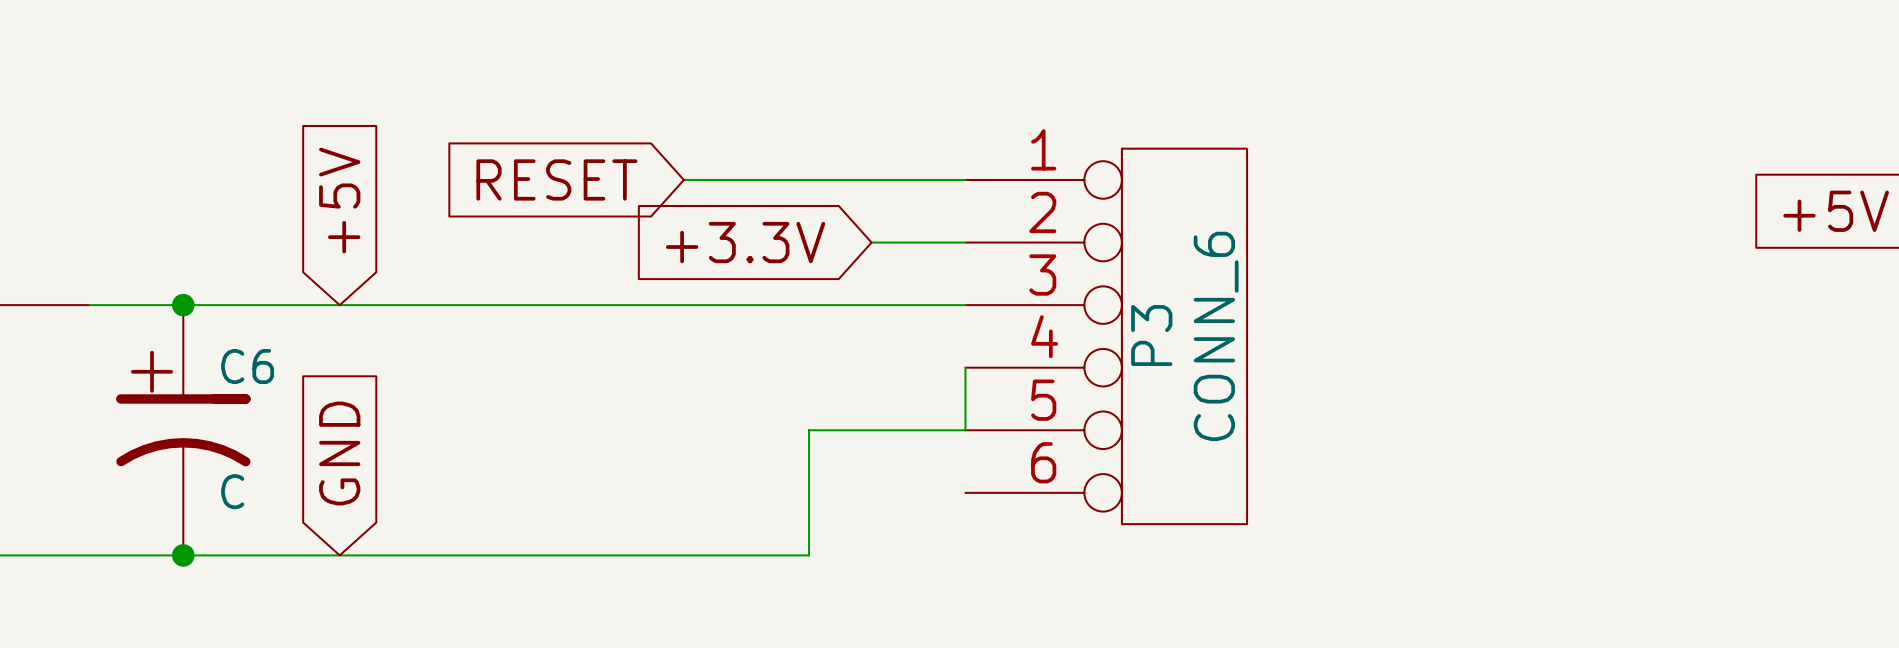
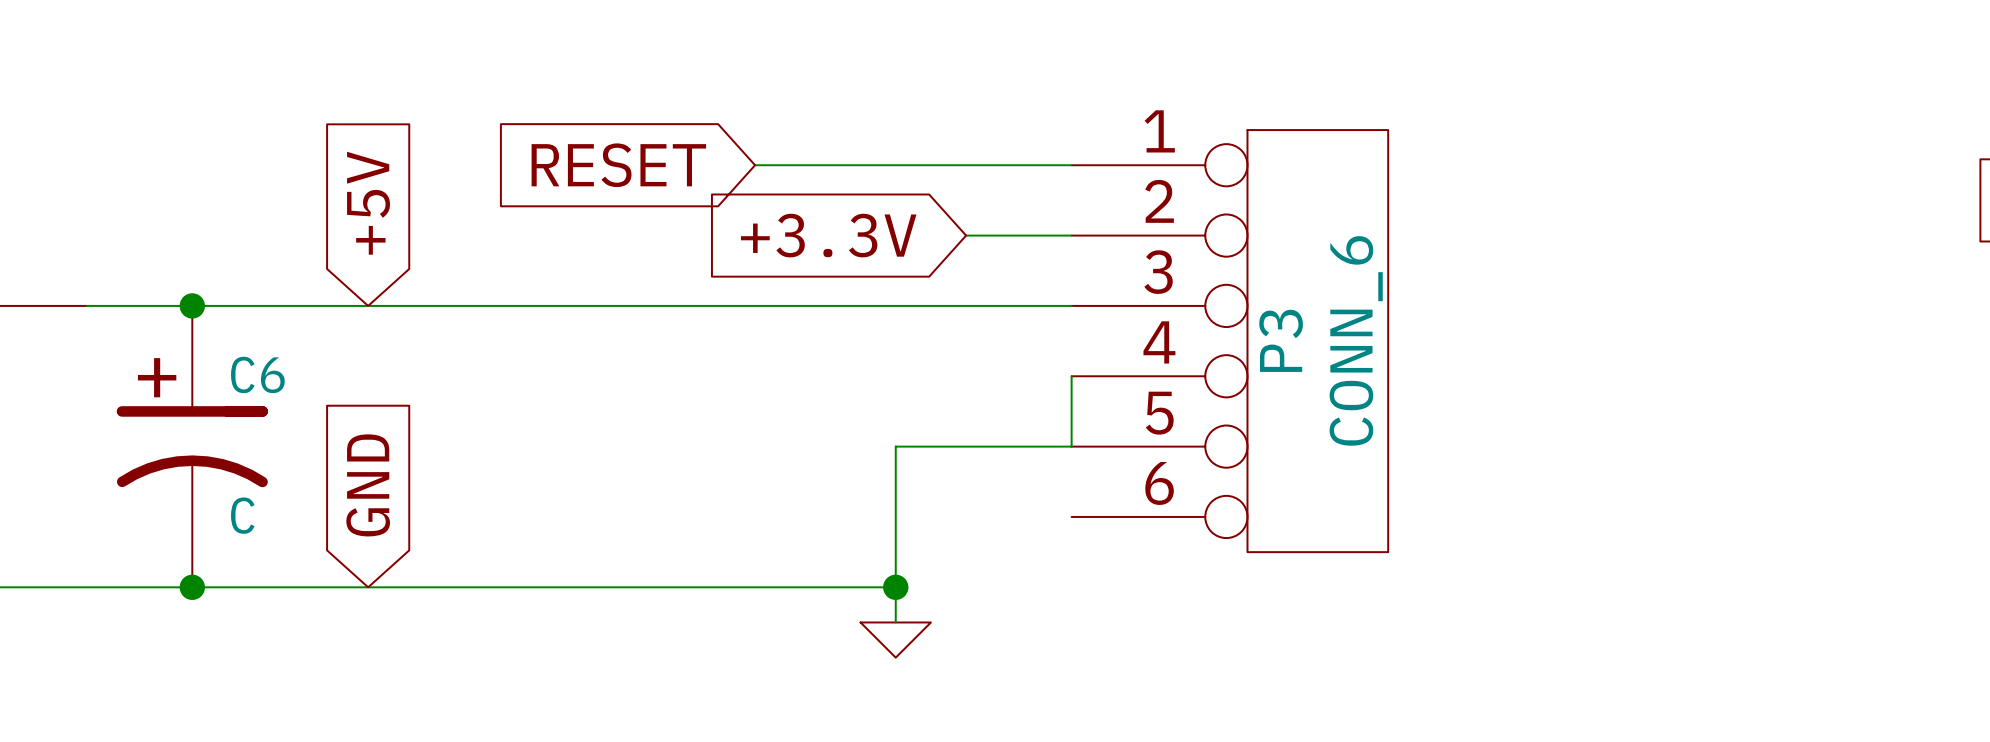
wire: none -> (895, 587) (895, 622)
junction: none -> (895, 587)
power symbol: none -> (895, 640)

